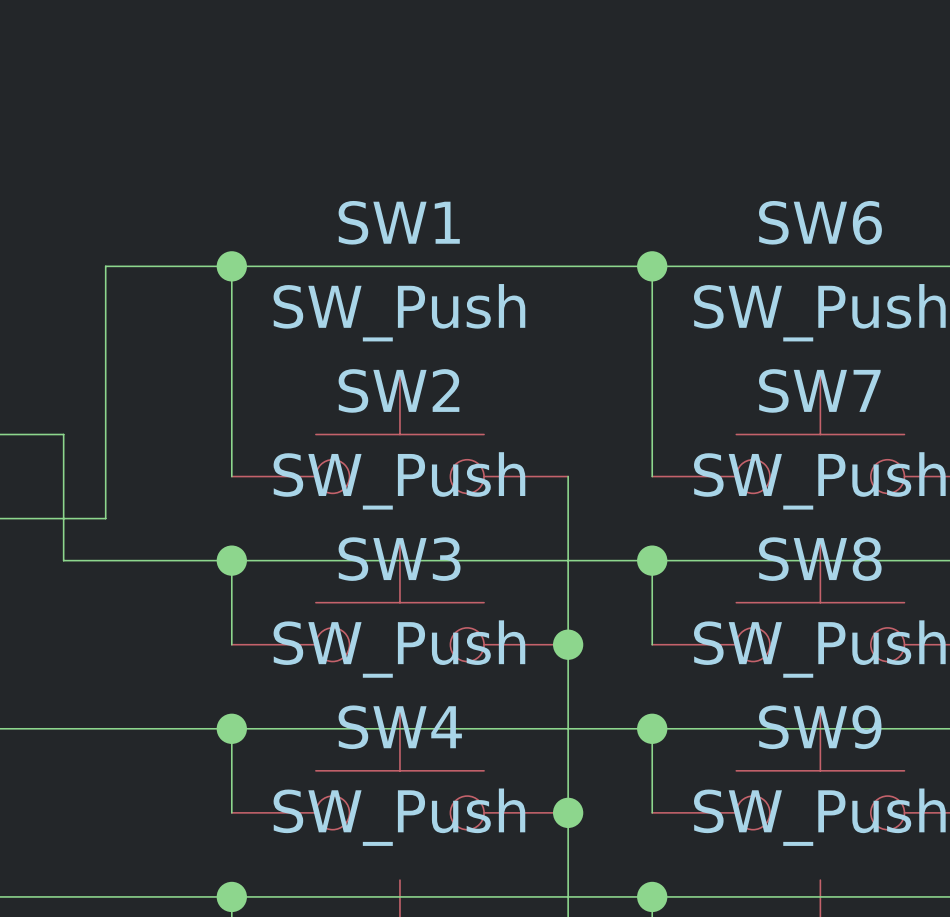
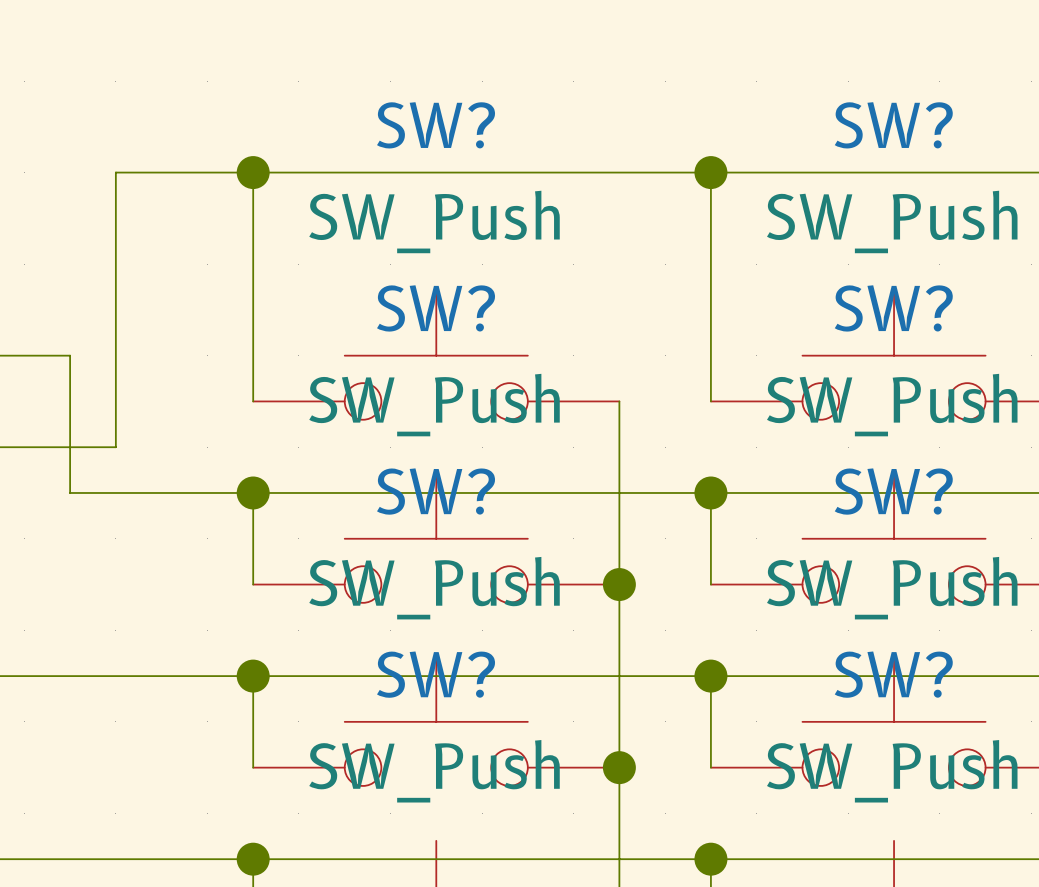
SW1 name: SW1 (399, 222) -> SW? (436, 125)
SW6 name: SW6 (820, 222) -> SW? (893, 125)
SW2 name: SW2 (398, 390) -> SW? (436, 308)
SW7 name: SW7 (819, 390) -> SW? (893, 308)
SW3 name: SW3 (399, 559) -> SW? (436, 491)
SW8 name: SW8 (820, 559) -> SW? (893, 491)
SW4 name: SW4 (400, 727) -> SW? (436, 674)
SW9 name: SW9 (820, 727) -> SW? (893, 674)

